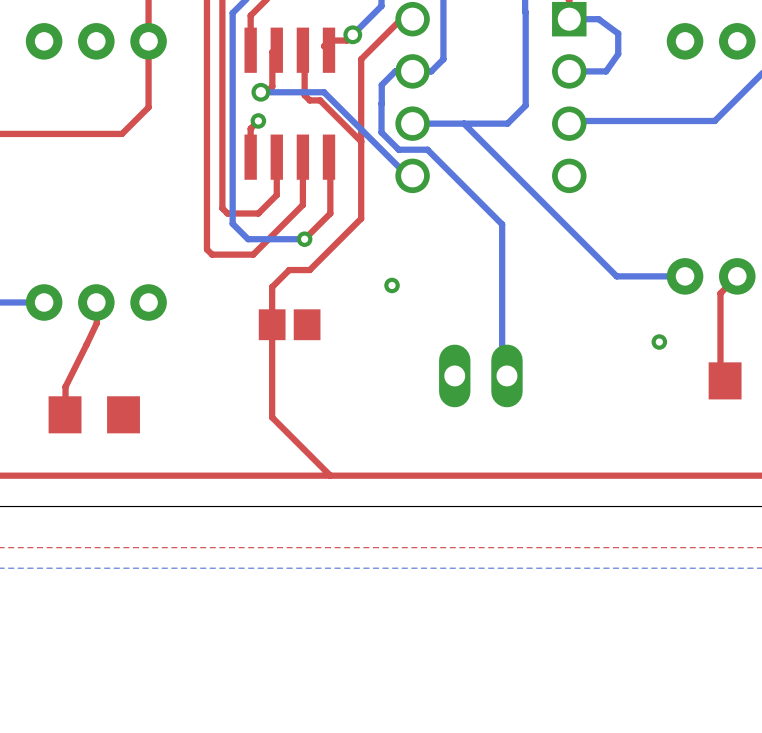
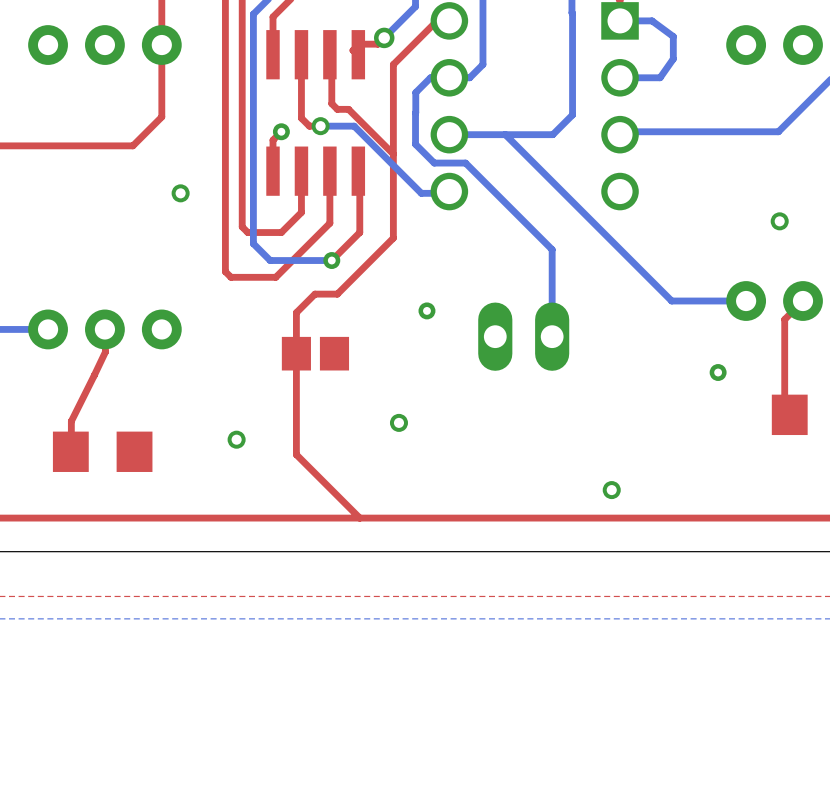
top track: (276, 50) (272, 52) (272, 86) (266, 92) (260, 92) -> (301, 54) (301, 118) (309, 126) (320, 126)
bottom track: (260, 92) (324, 92) (410, 178) (412, 175) -> (320, 126) (354, 126) (421, 193) (447, 193) (449, 191)
via: (260, 92) -> none
via: none -> (320, 126)
via: none -> (180, 193)
via: none -> (779, 221)
bottom track: (502, 224) (502, 373) (506, 375) -> (546, 244) (552, 249) (552, 336)
part position: (480, 375) -> (523, 336)
via: none -> (398, 422)
via: none -> (236, 439)
via: none -> (611, 490)

